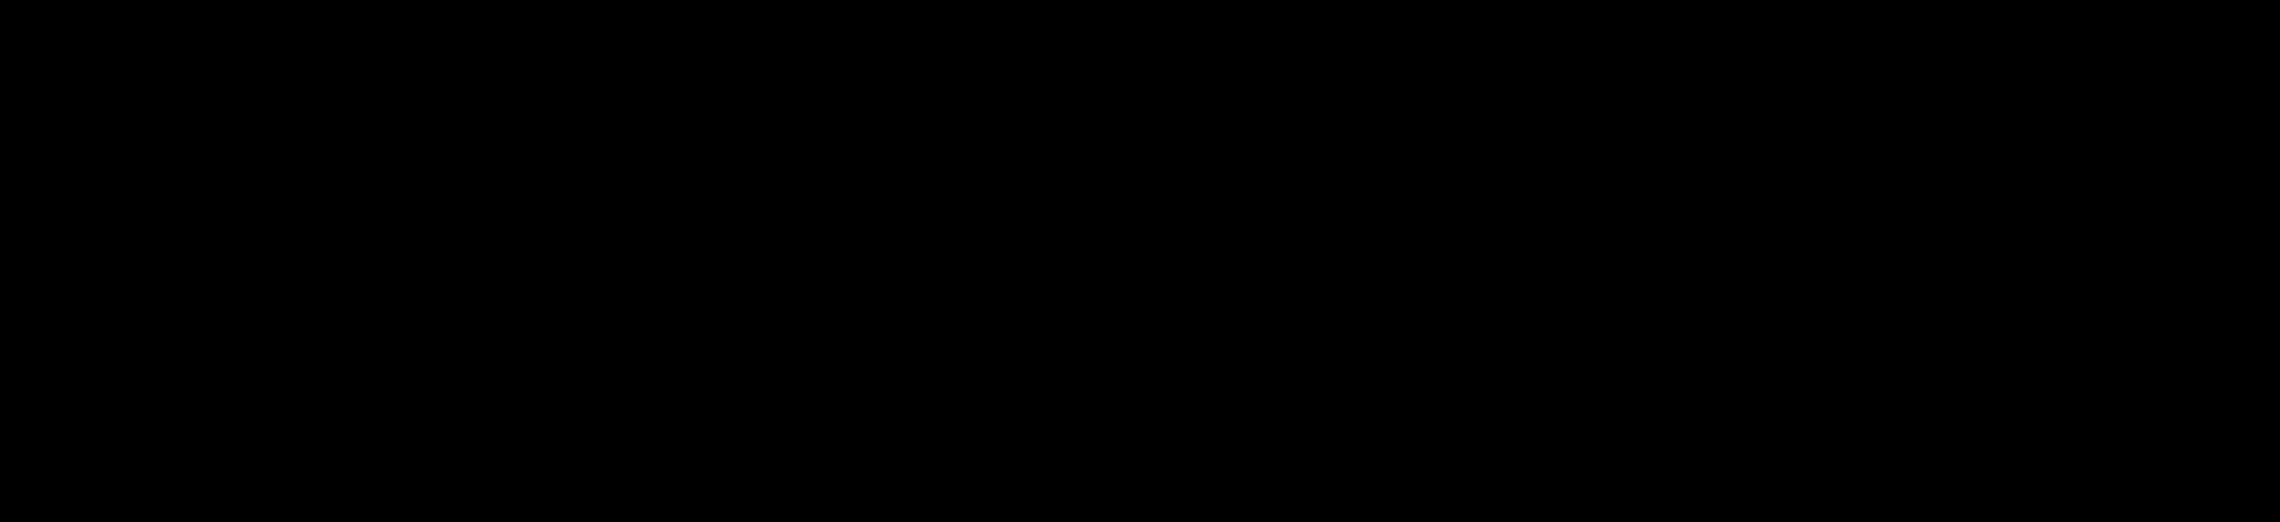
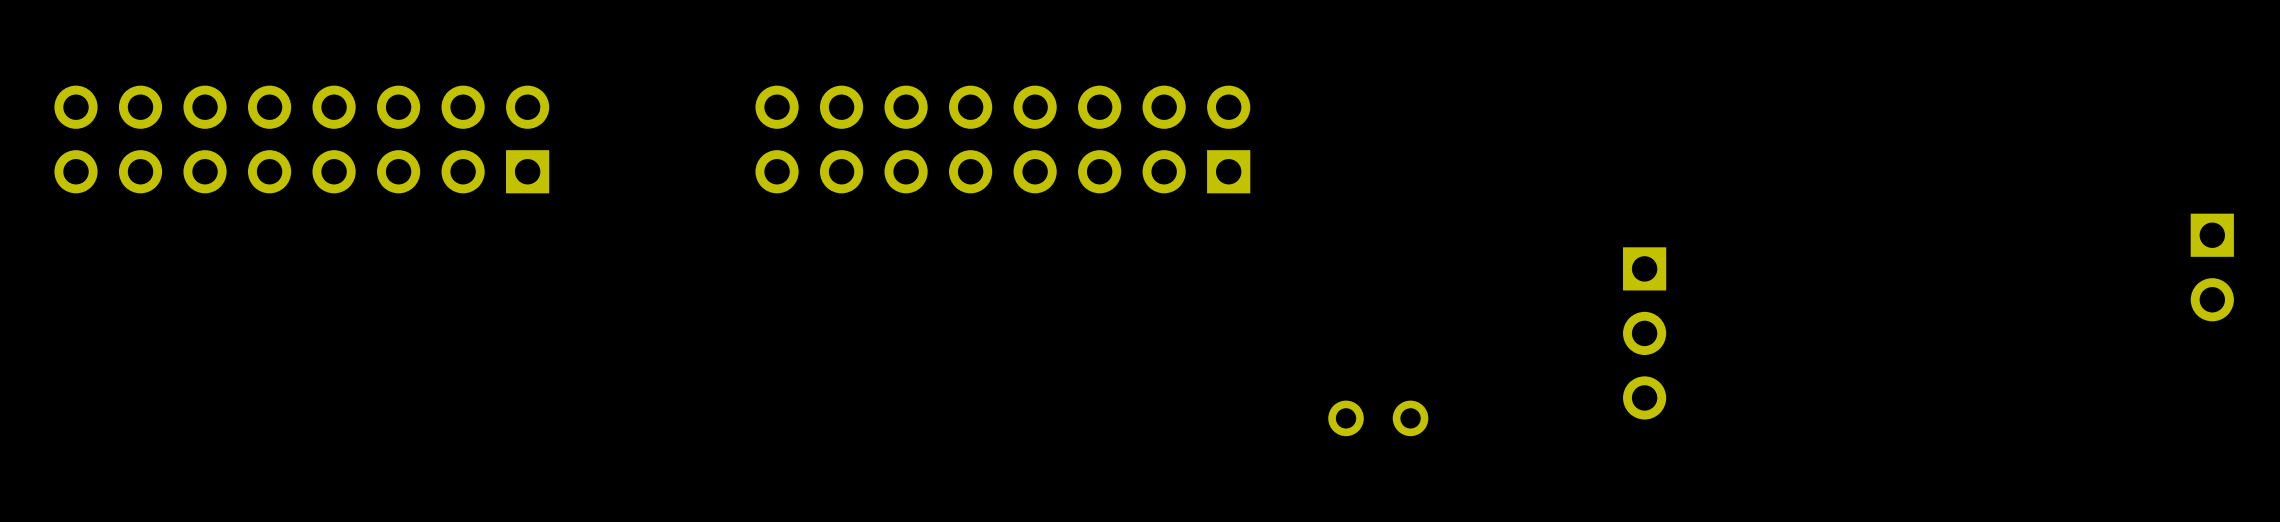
part: none -> (301, 139)
part: none -> (1002, 139)
part: none -> (2212, 267)
part: none -> (1644, 333)
part: none -> (1378, 418)

